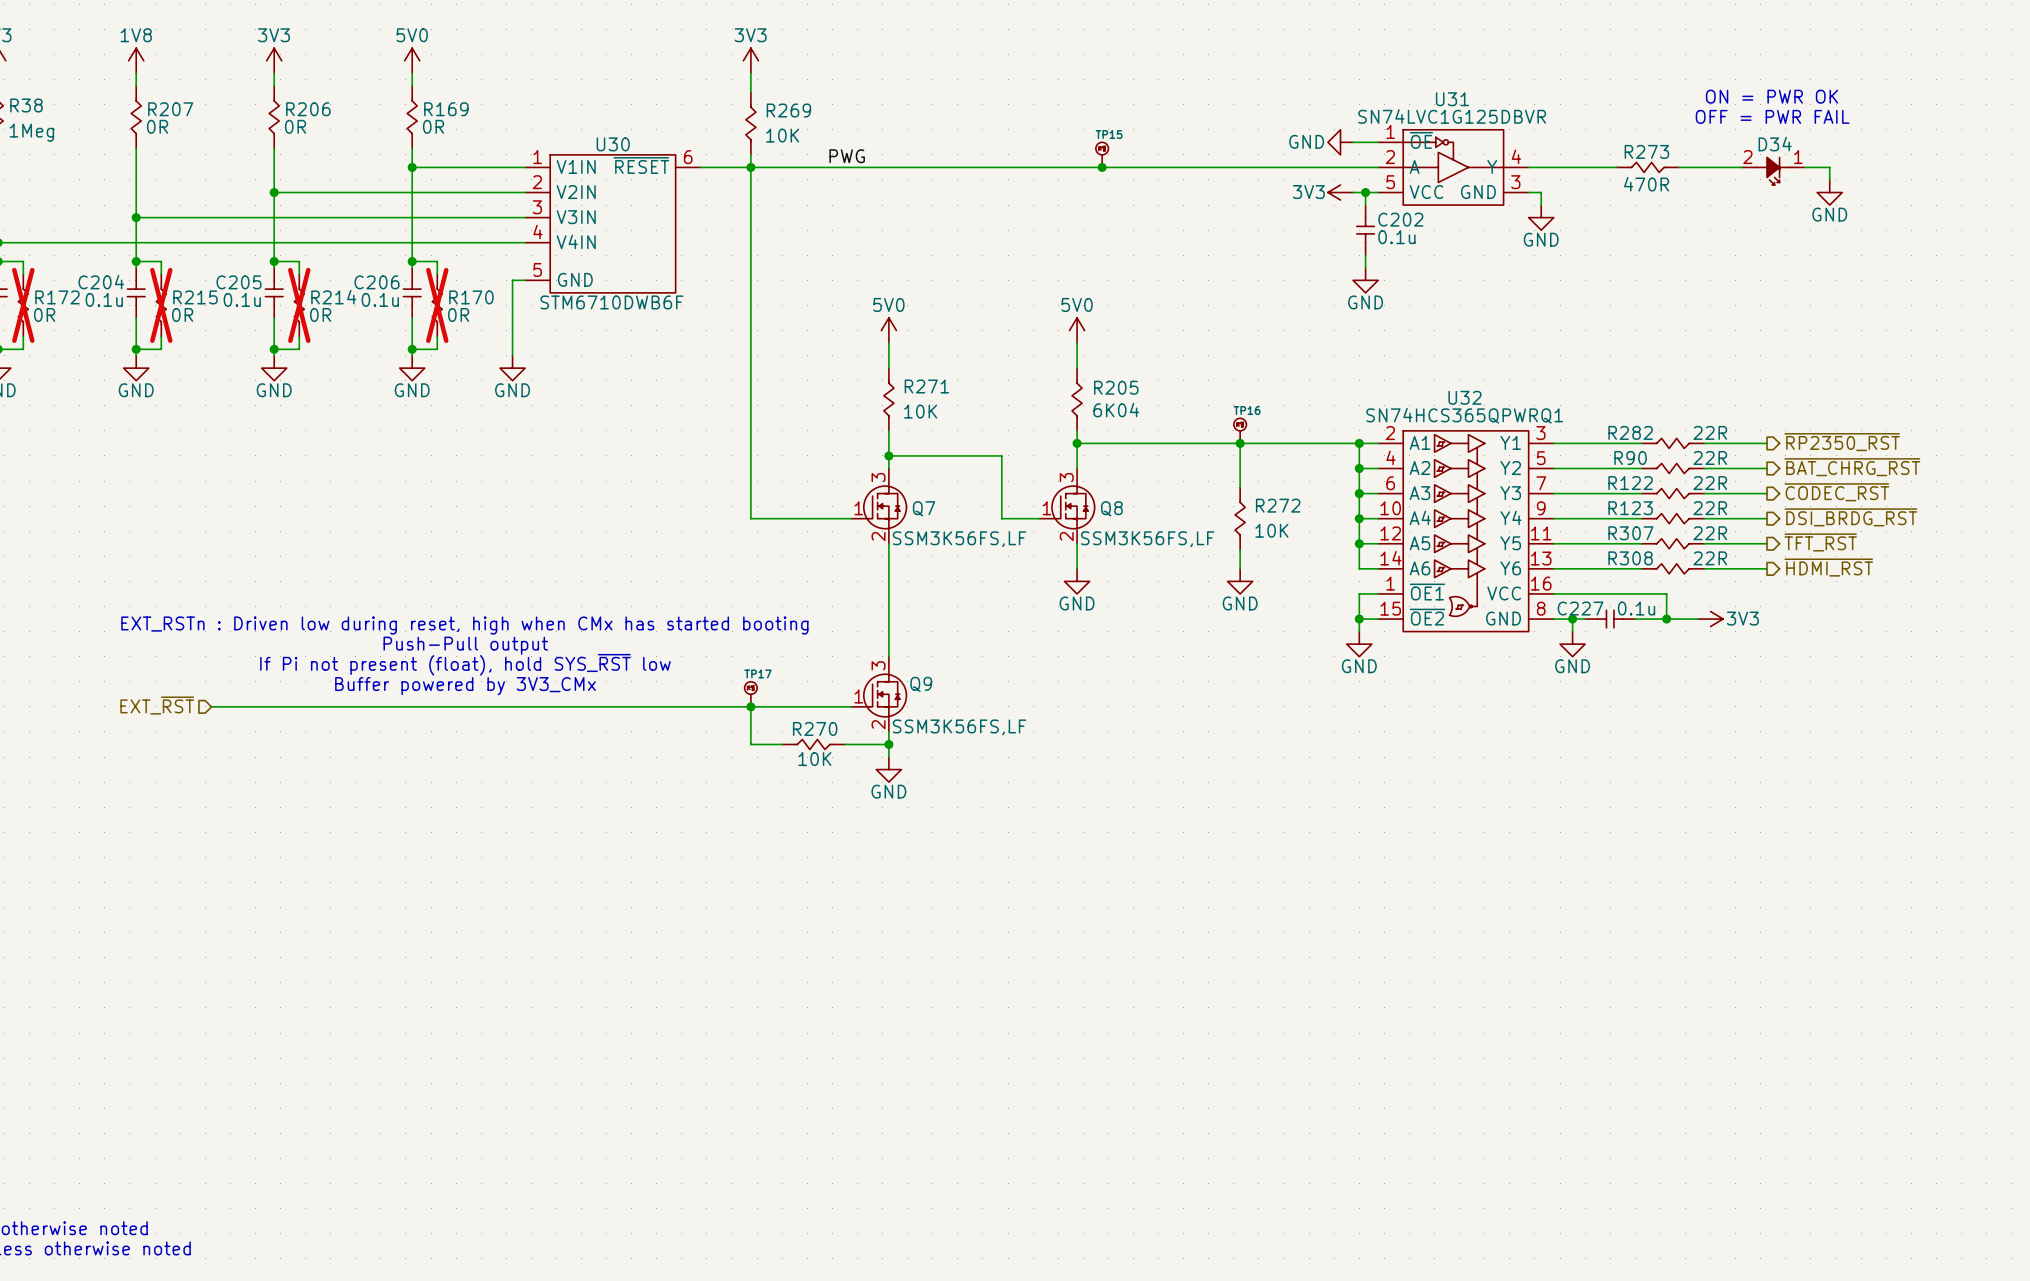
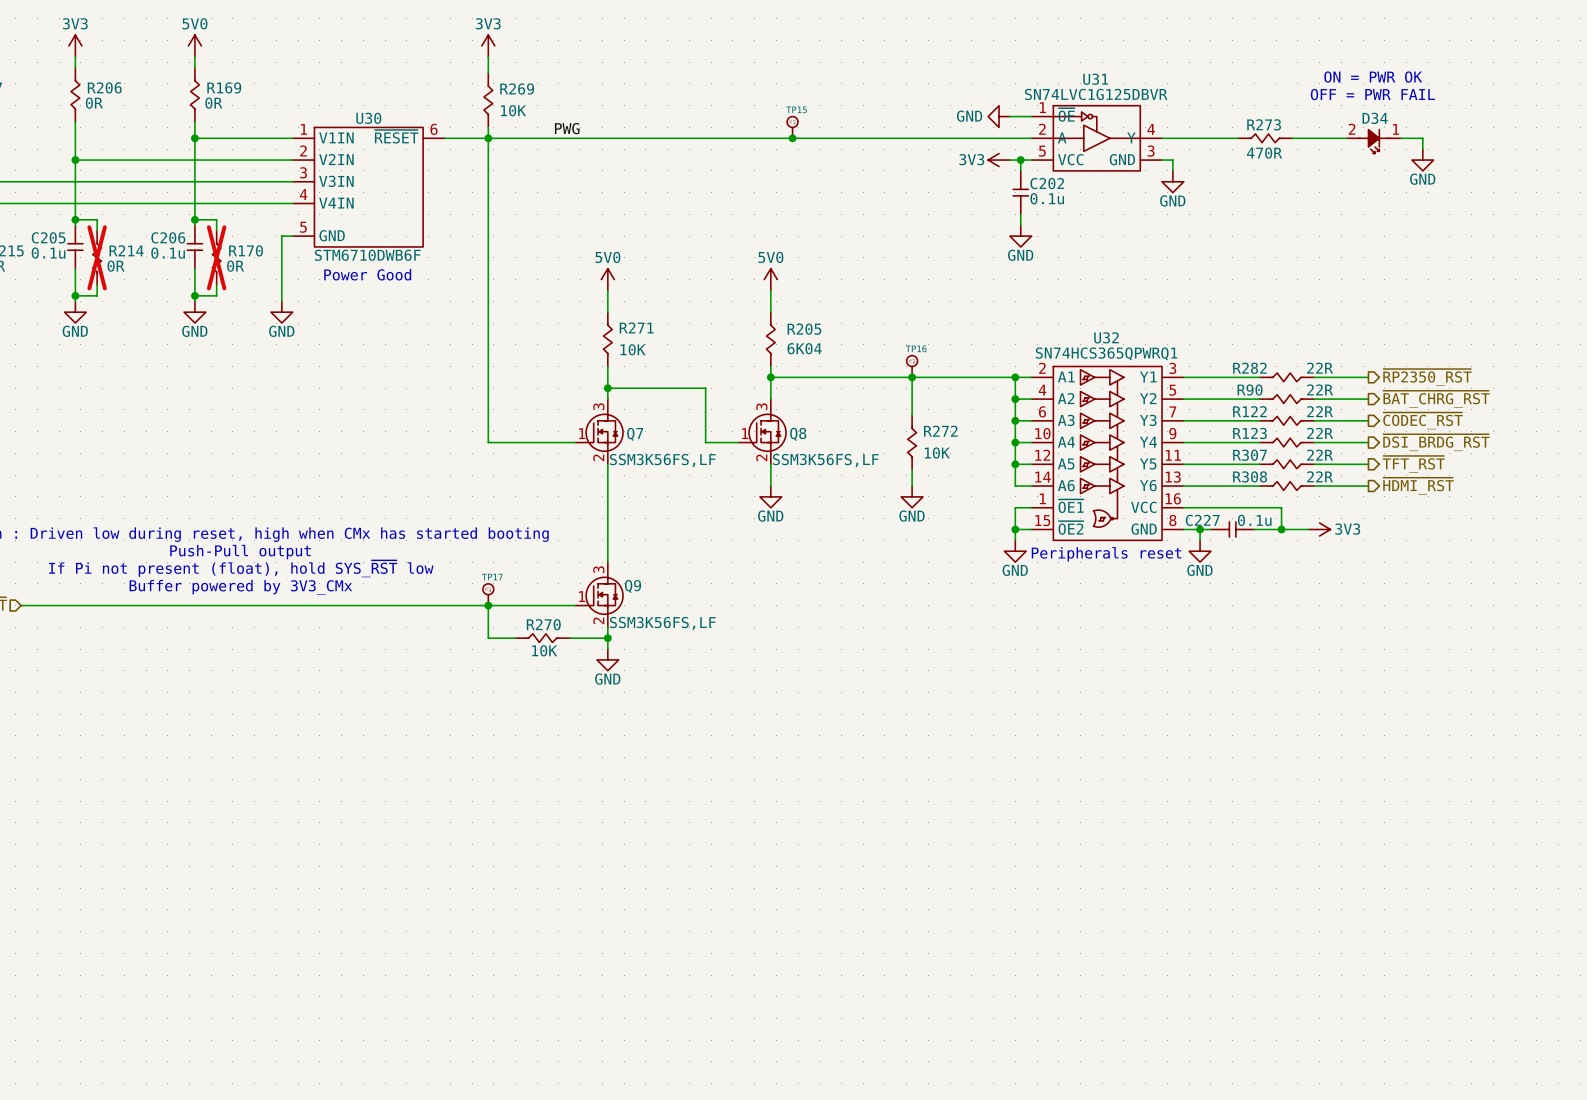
text: none -> Power Good (367, 274)
text: none -> Peripherals reset (1106, 554)

